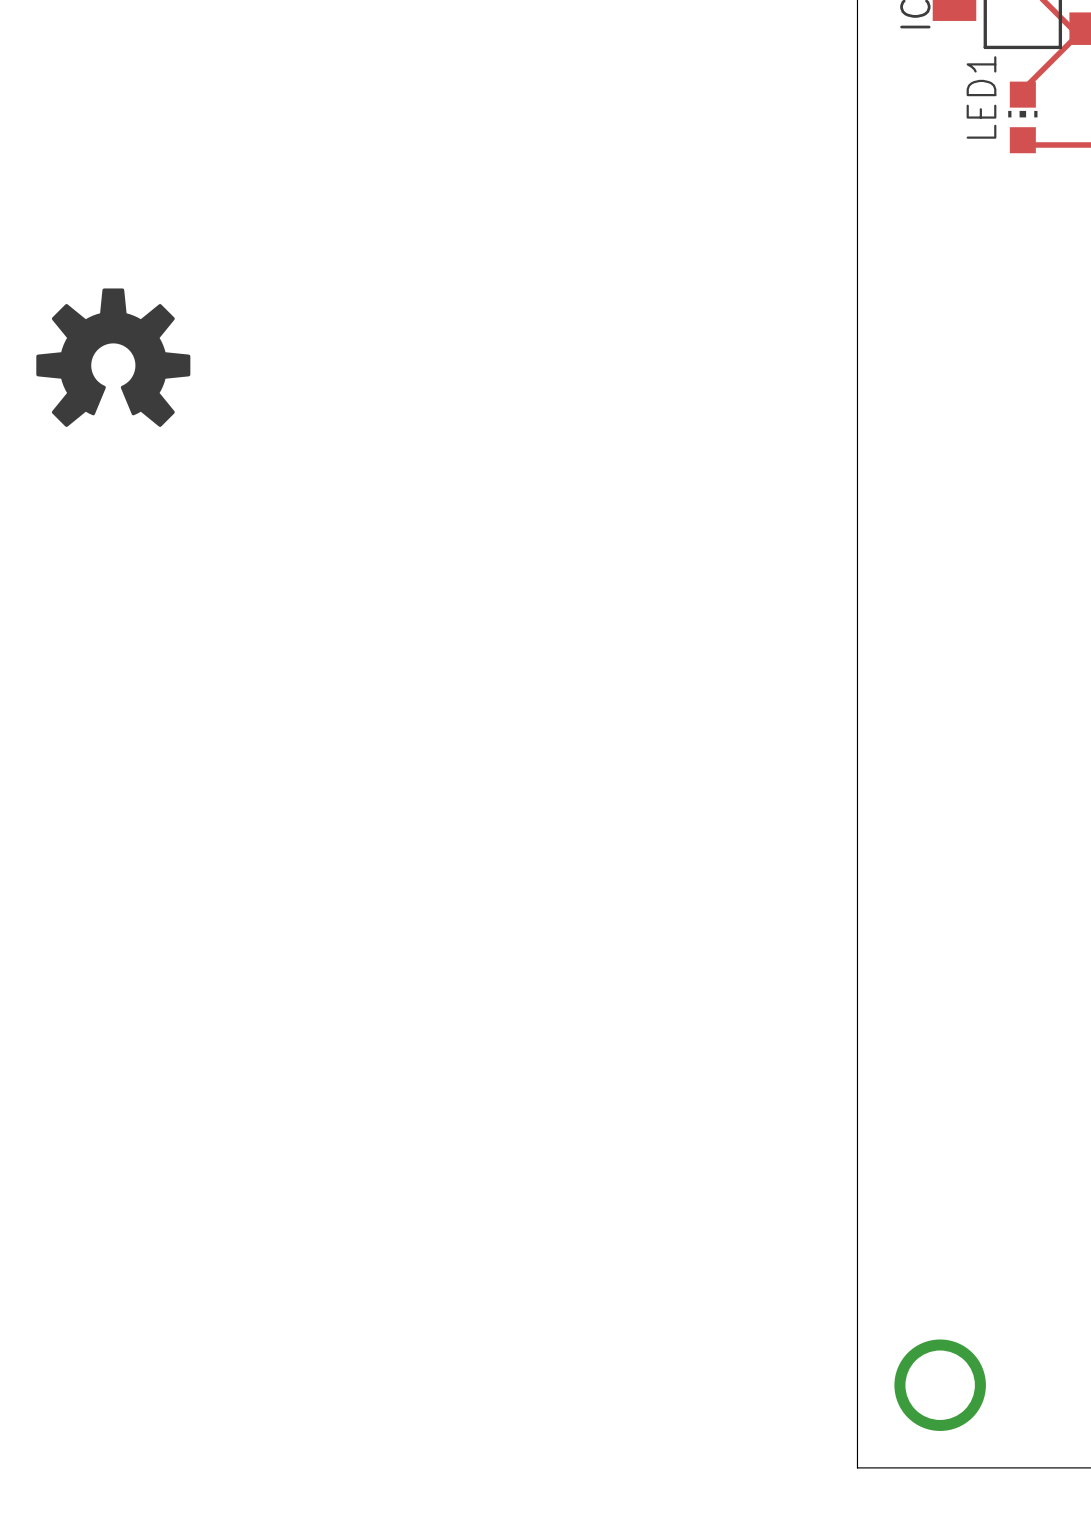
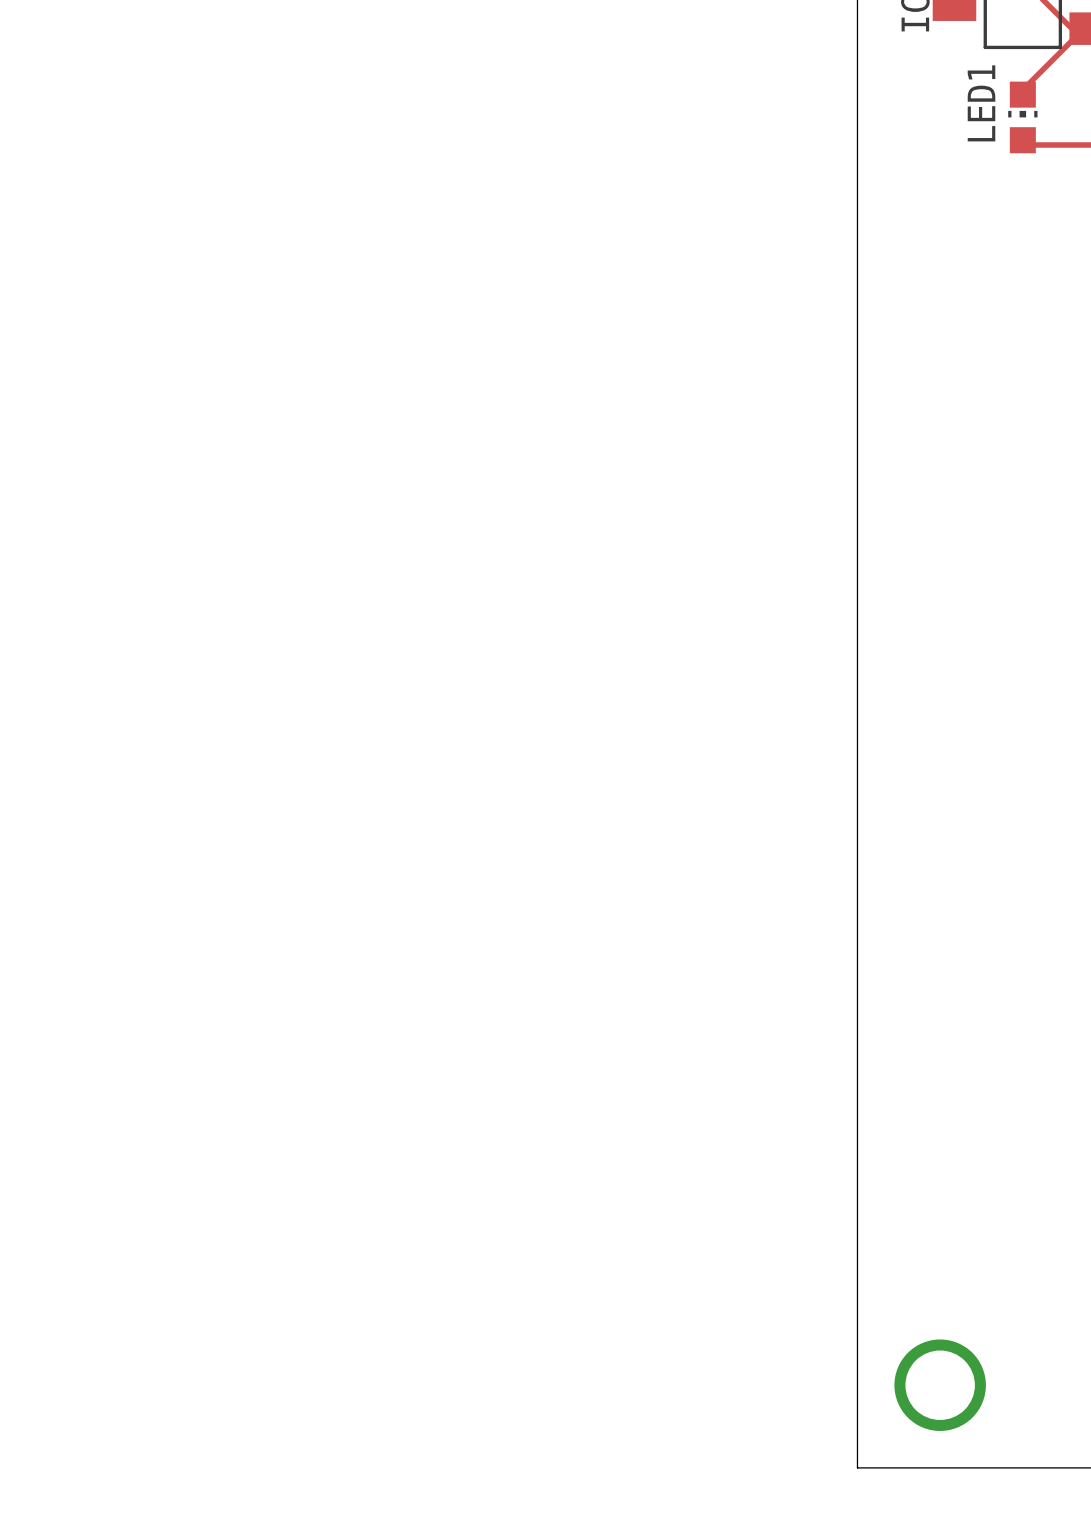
drawing: [36, 288, 191, 427] -> none

